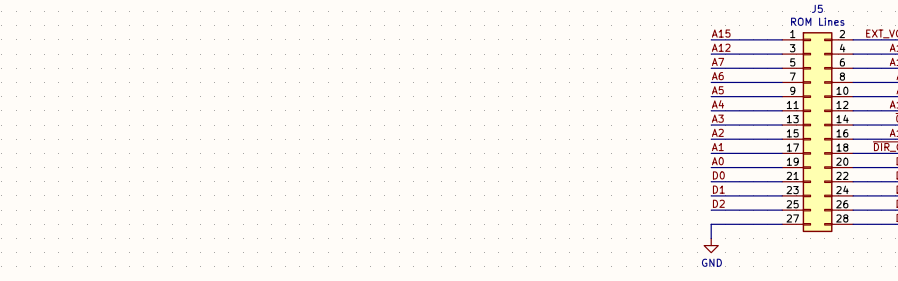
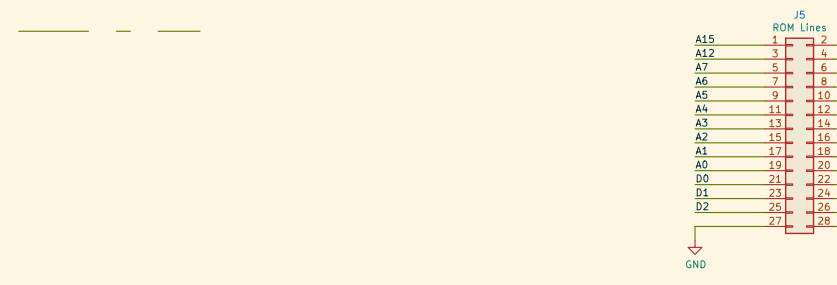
wire: none -> (18, 31) (88, 31)
wire: none -> (116, 31) (130, 31)
wire: none -> (158, 31) (200, 31)

